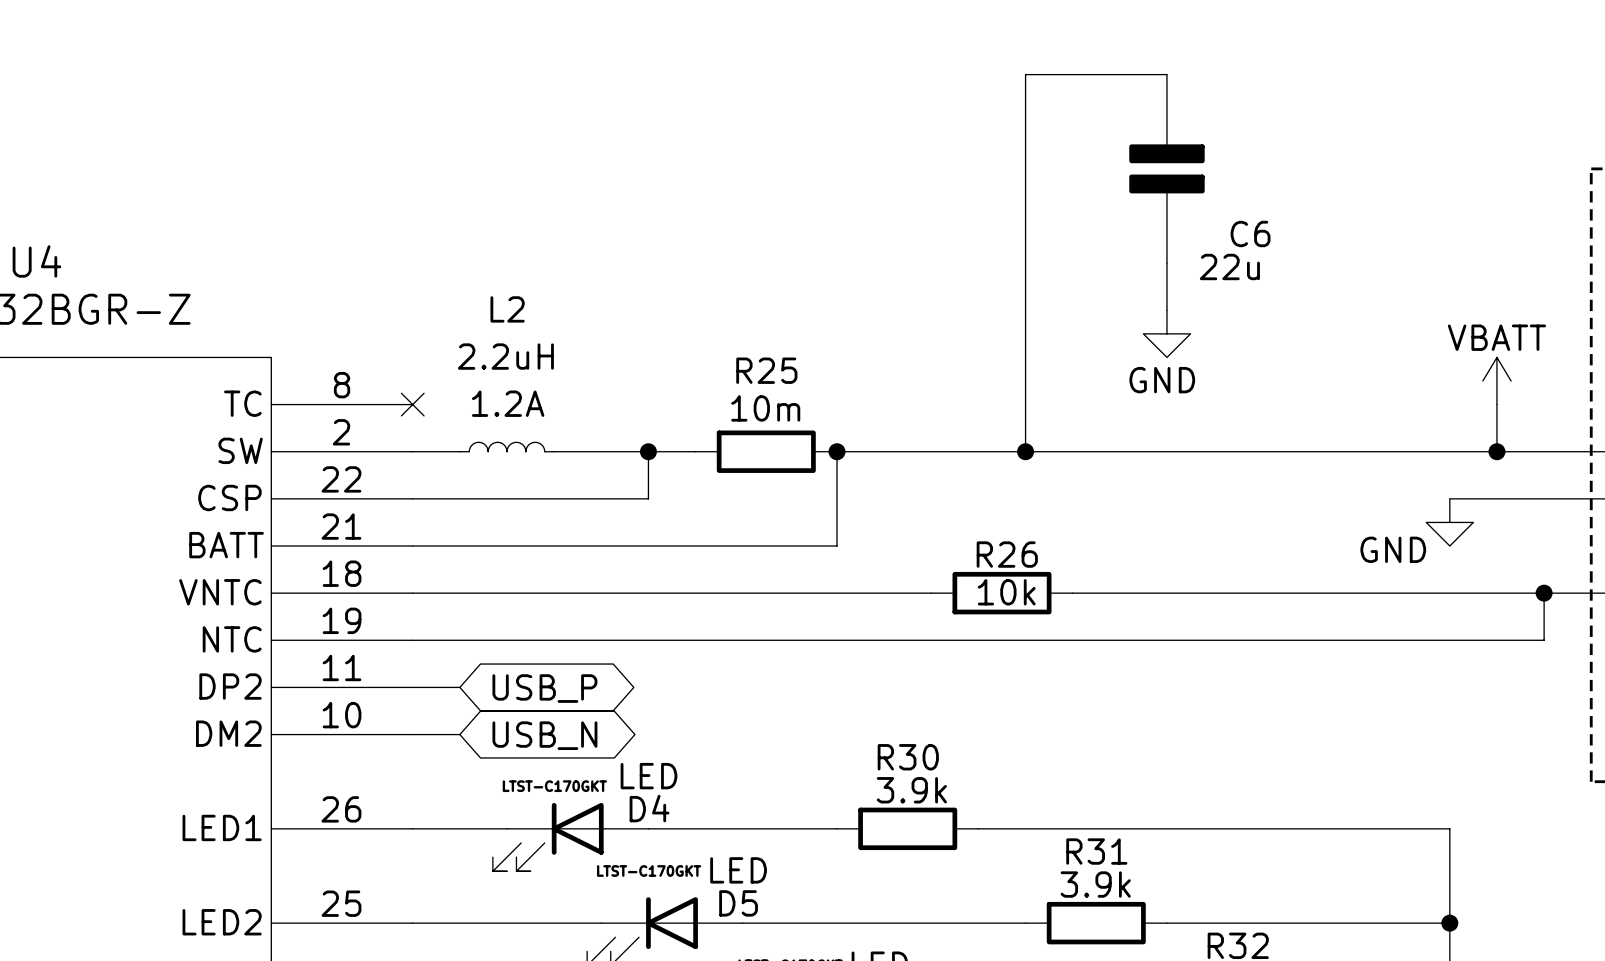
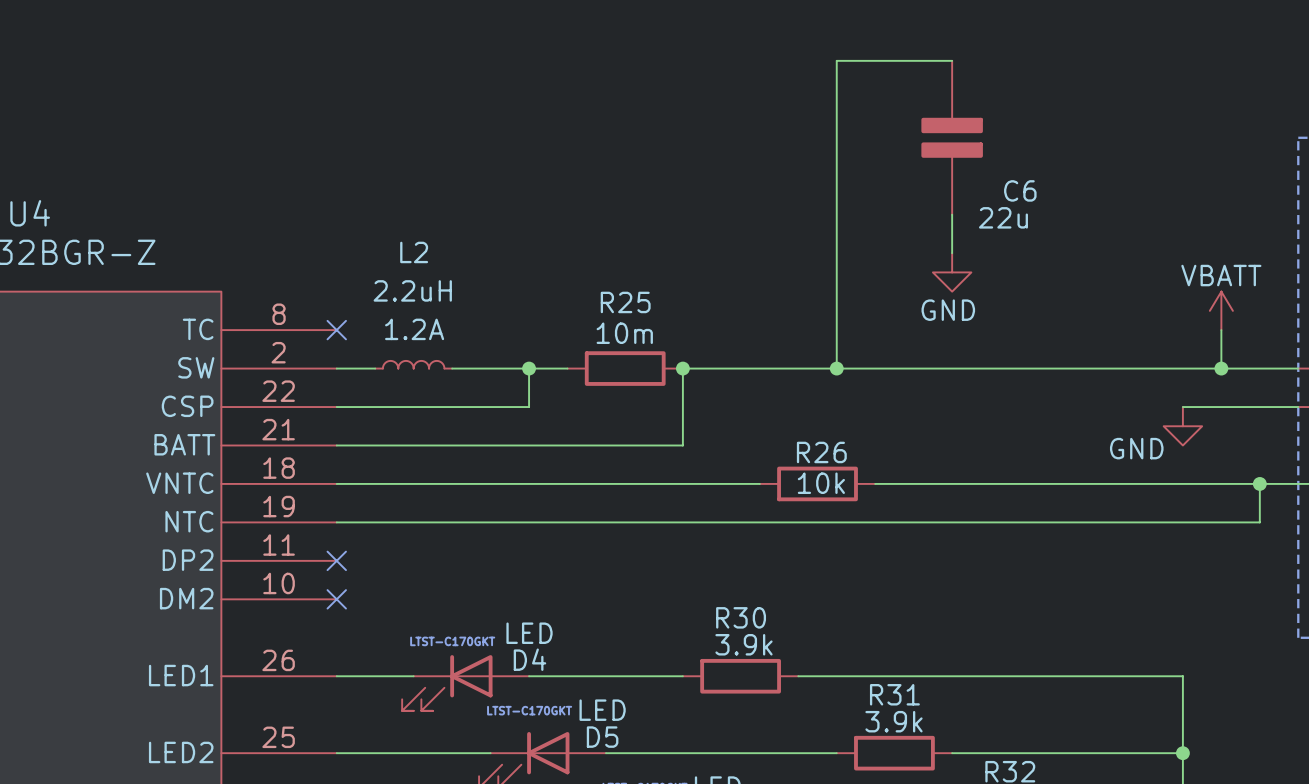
wire: (412, 687) (459, 687) -> none
no-connect mark: none -> (336, 560)
global label: USB_P (544, 688) -> none
wire: (412, 734) (459, 734) -> none
no-connect mark: none -> (336, 599)
global label: USB_N (544, 735) -> none

